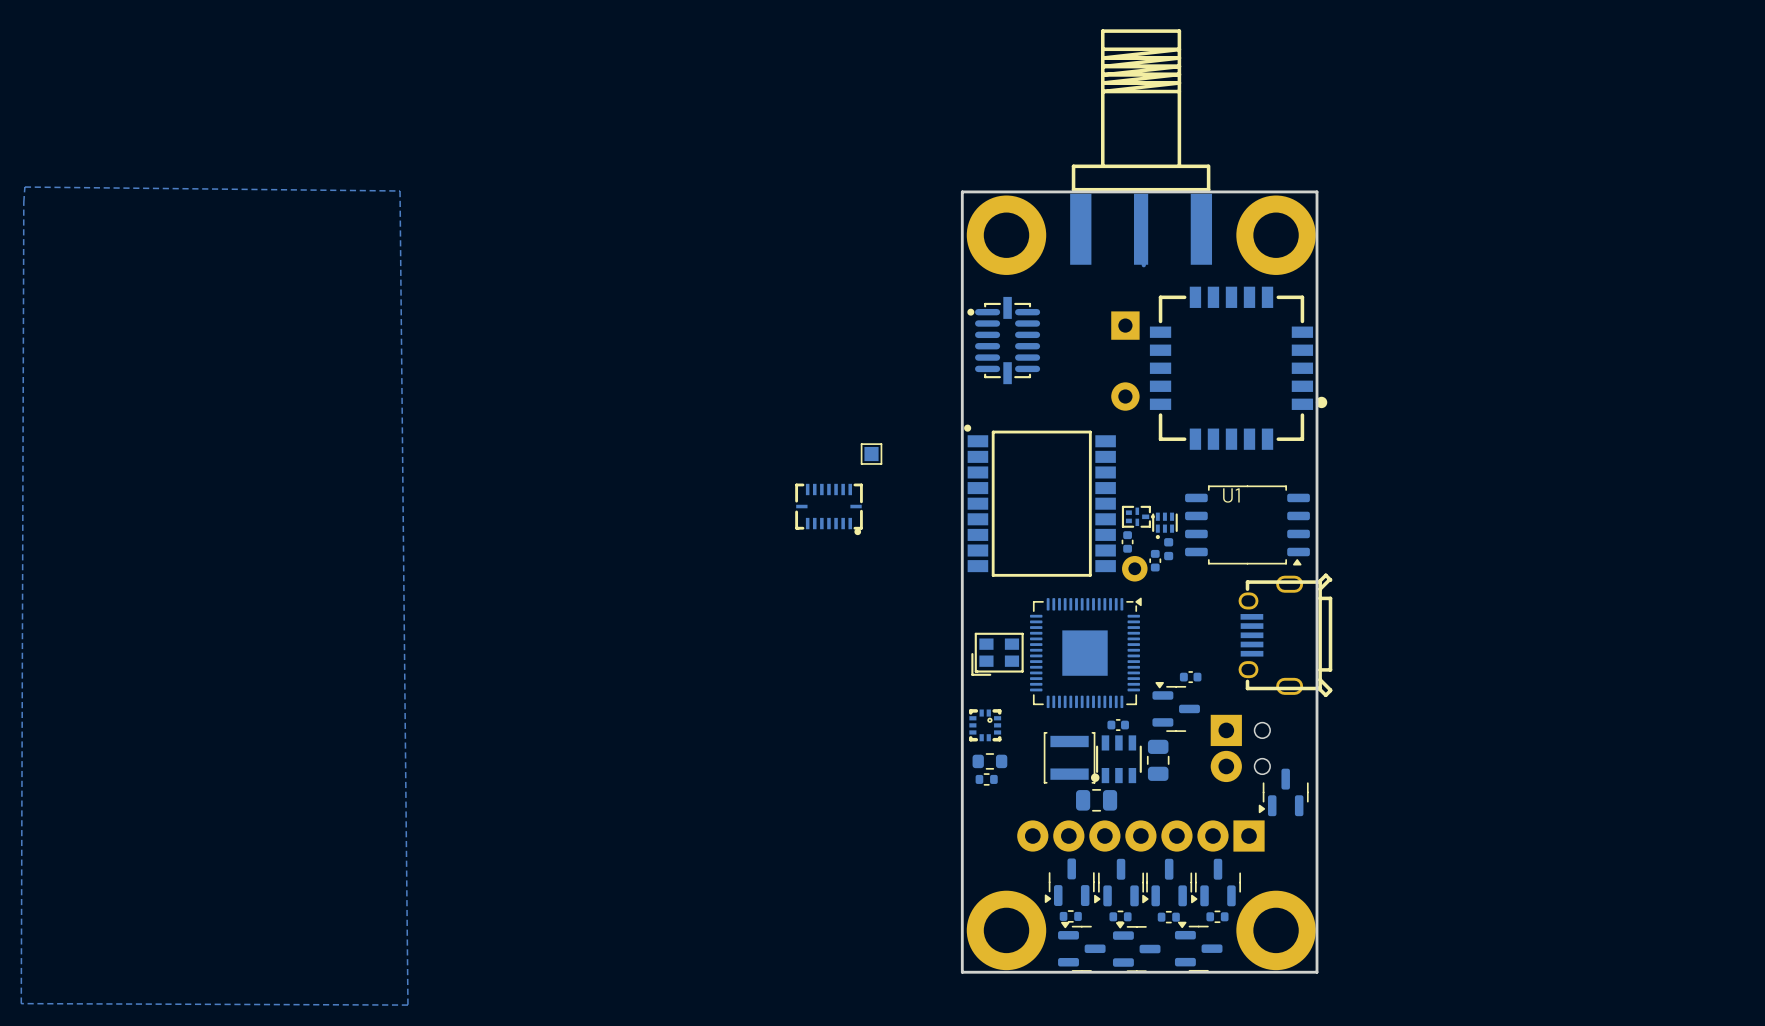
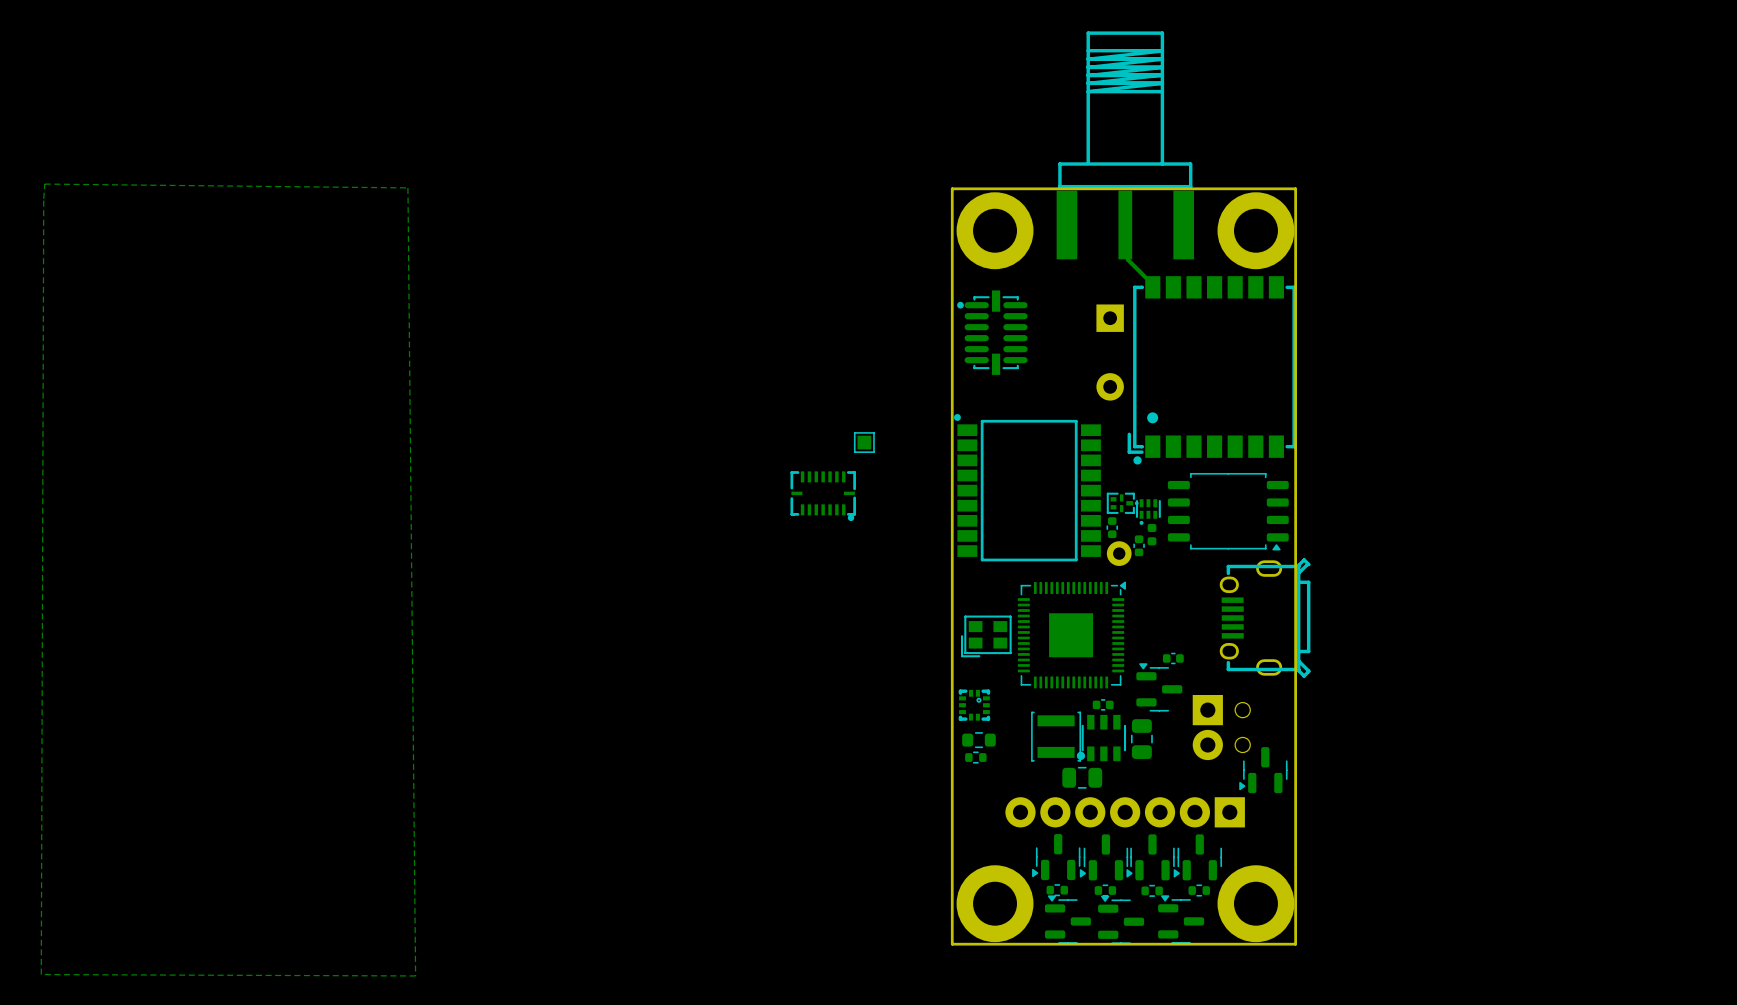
track: none -> (1127, 259) (1152, 284) (1152, 286)
U1: (1238, 368) -> none
part: none -> (1211, 370)

